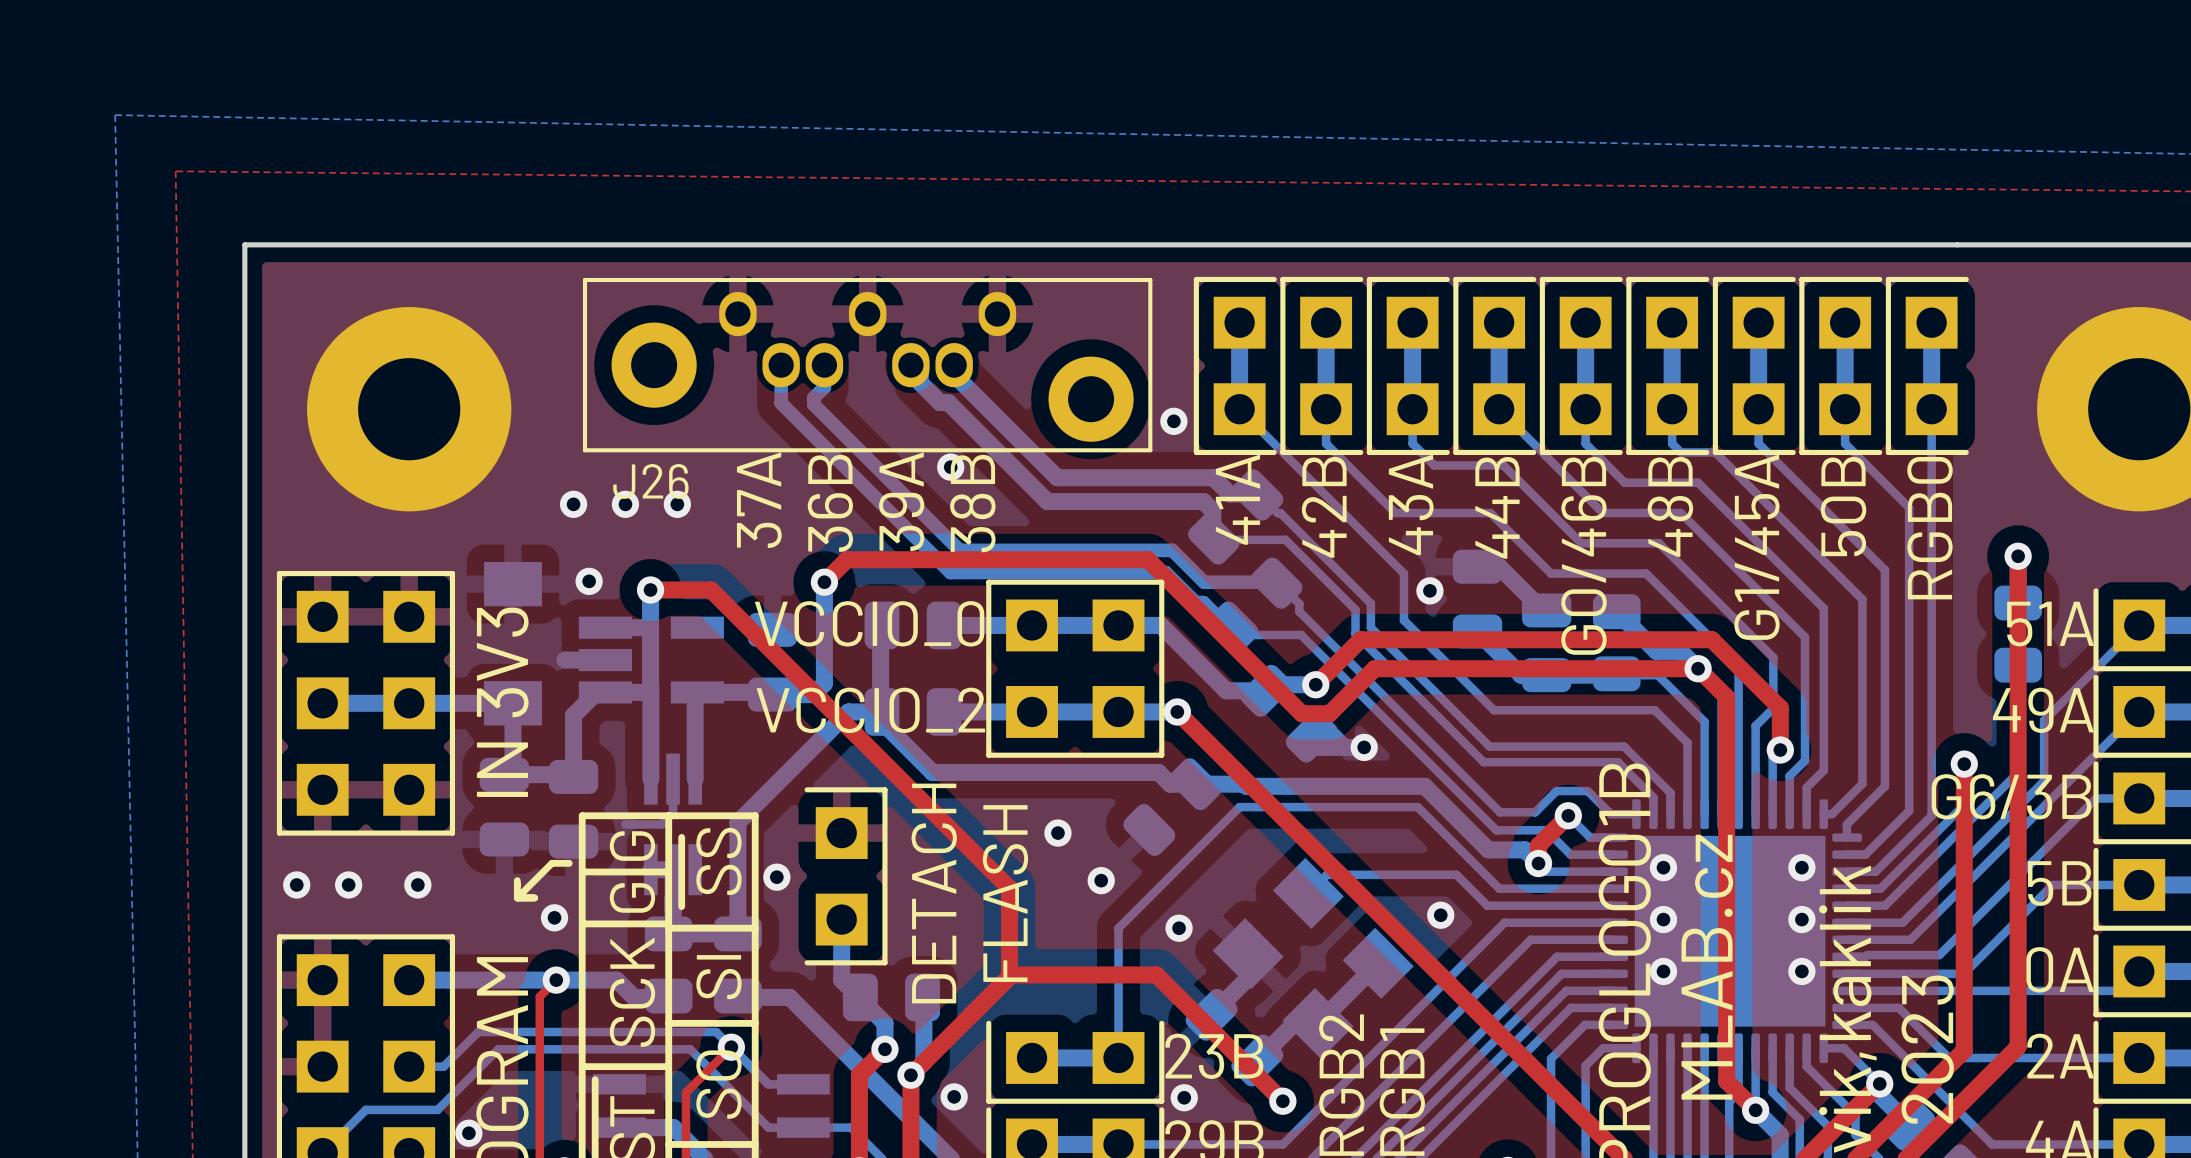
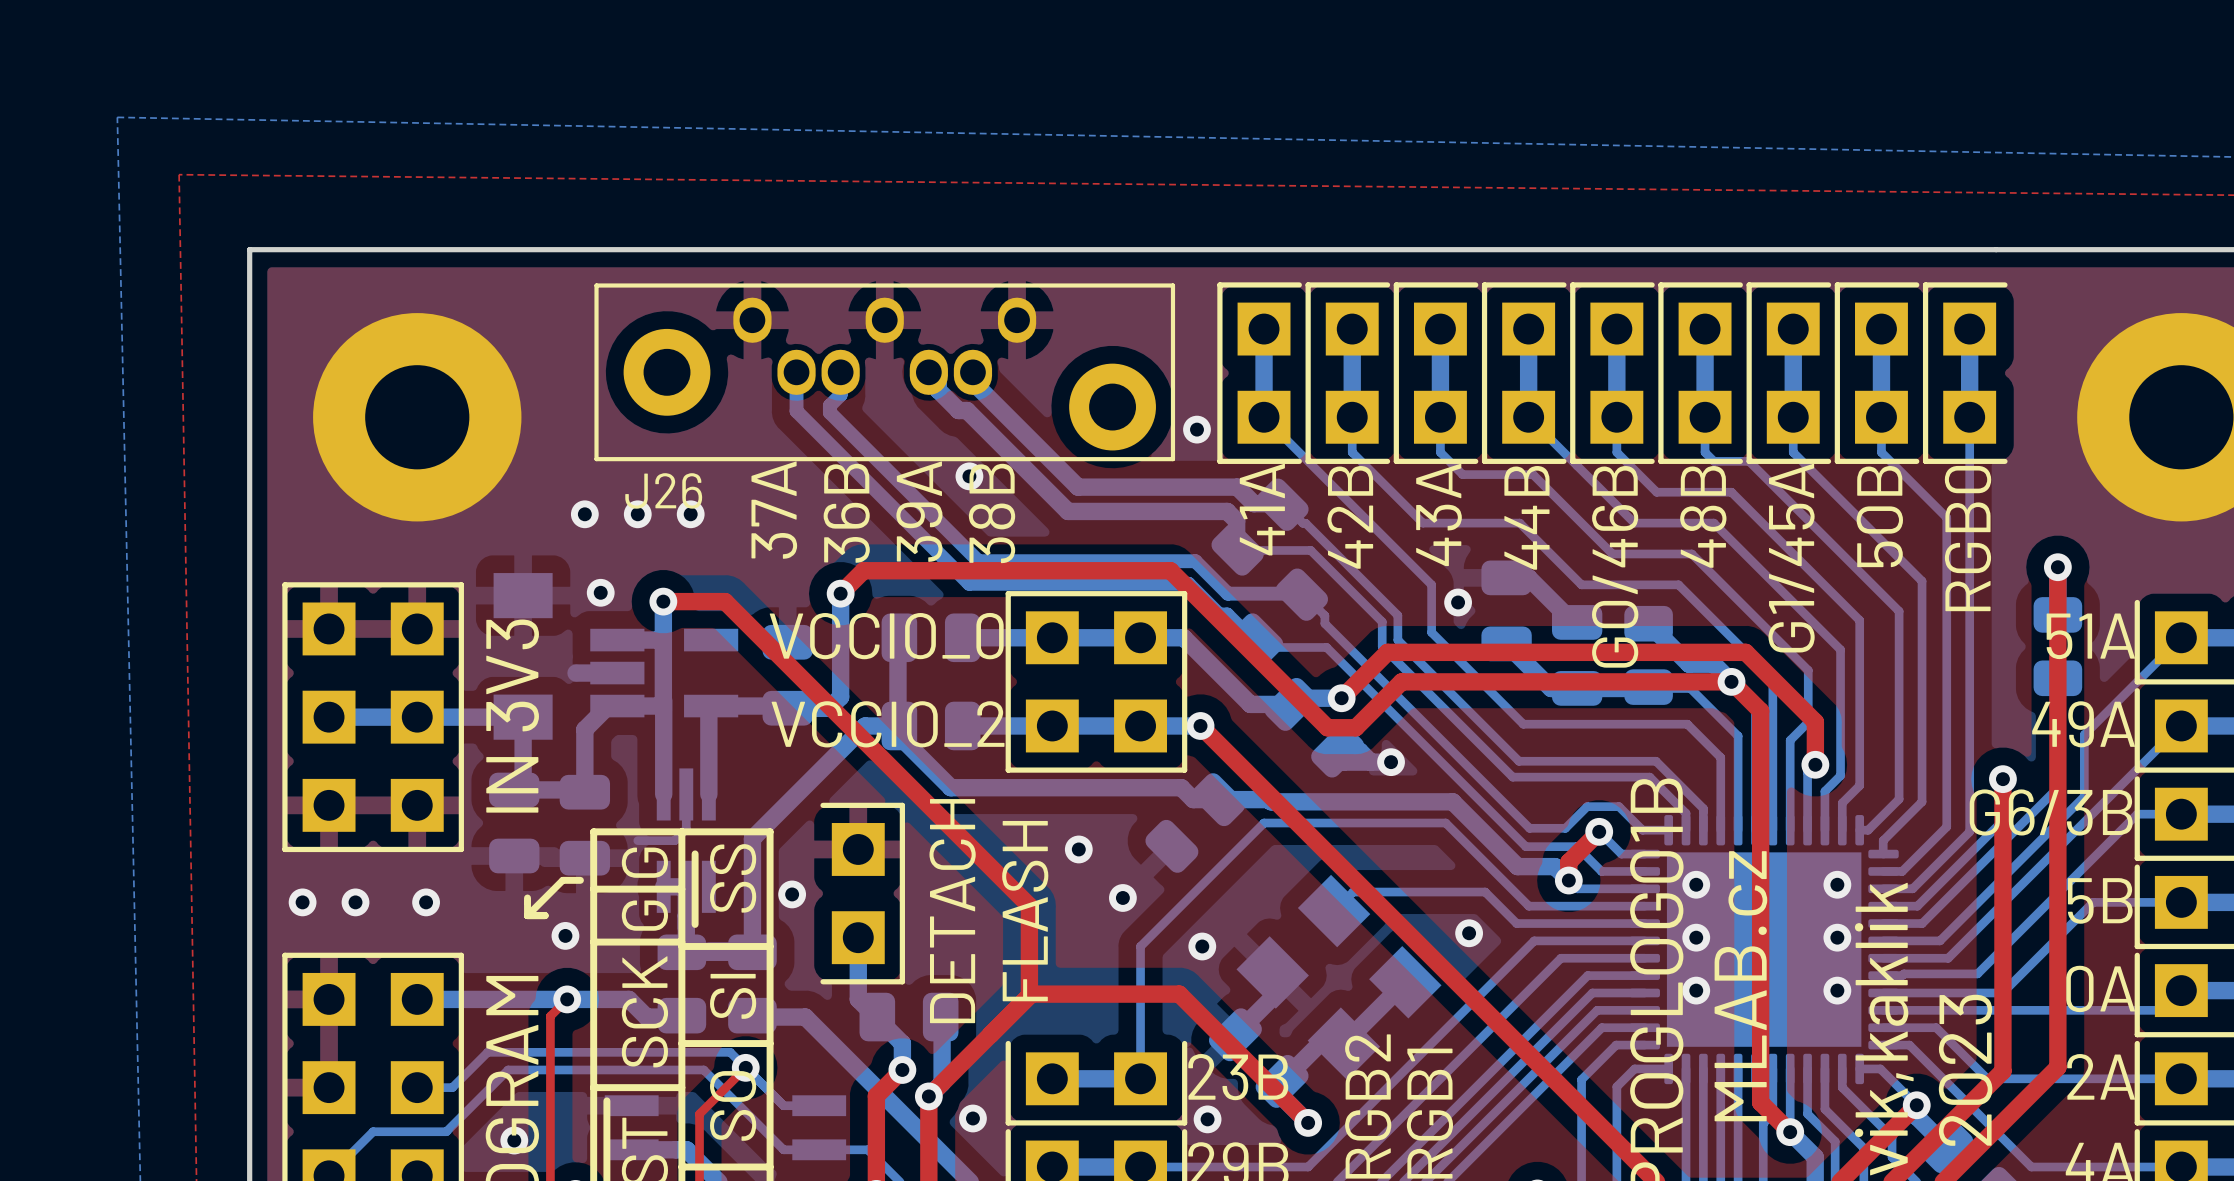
via position: (468, 1133) -> (514, 1140)

